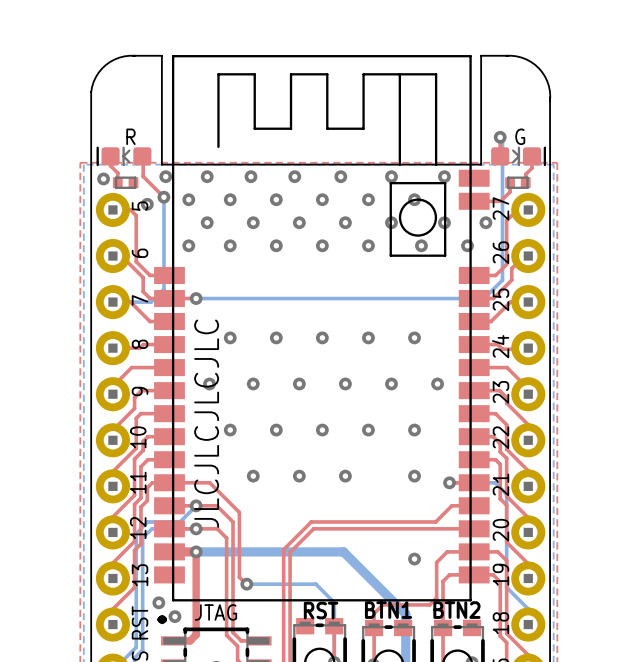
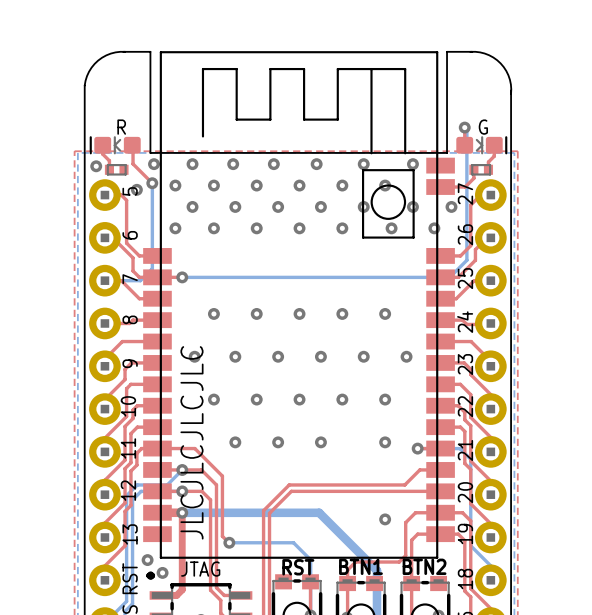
text position: JLCJLCJLCJLC (206, 423) -> JLCJLCJLCJLC (191, 442)

